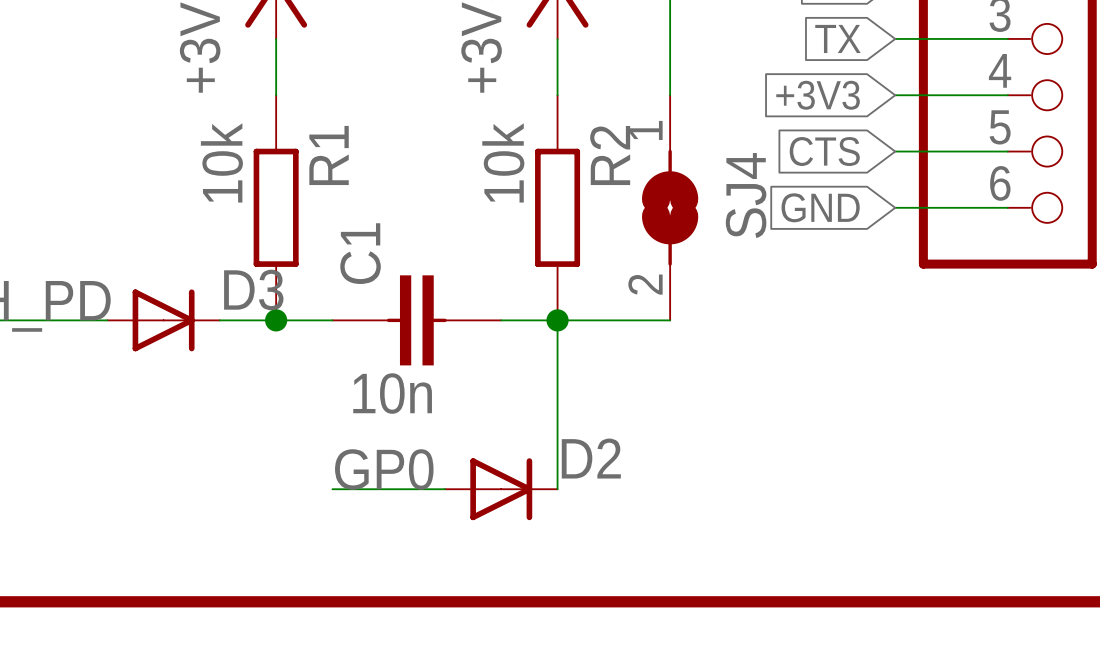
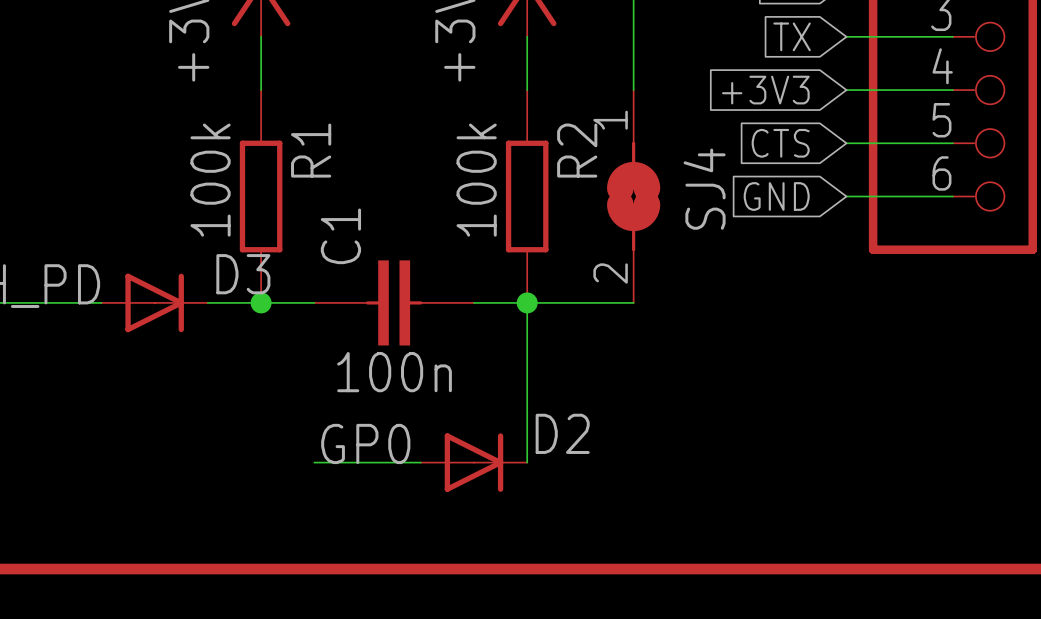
R1 value: 10k (221, 162) -> 100k (210, 180)
R2 value: 10k (503, 162) -> 100k (476, 180)
C1 value: 10n (392, 393) -> 100n (394, 372)

